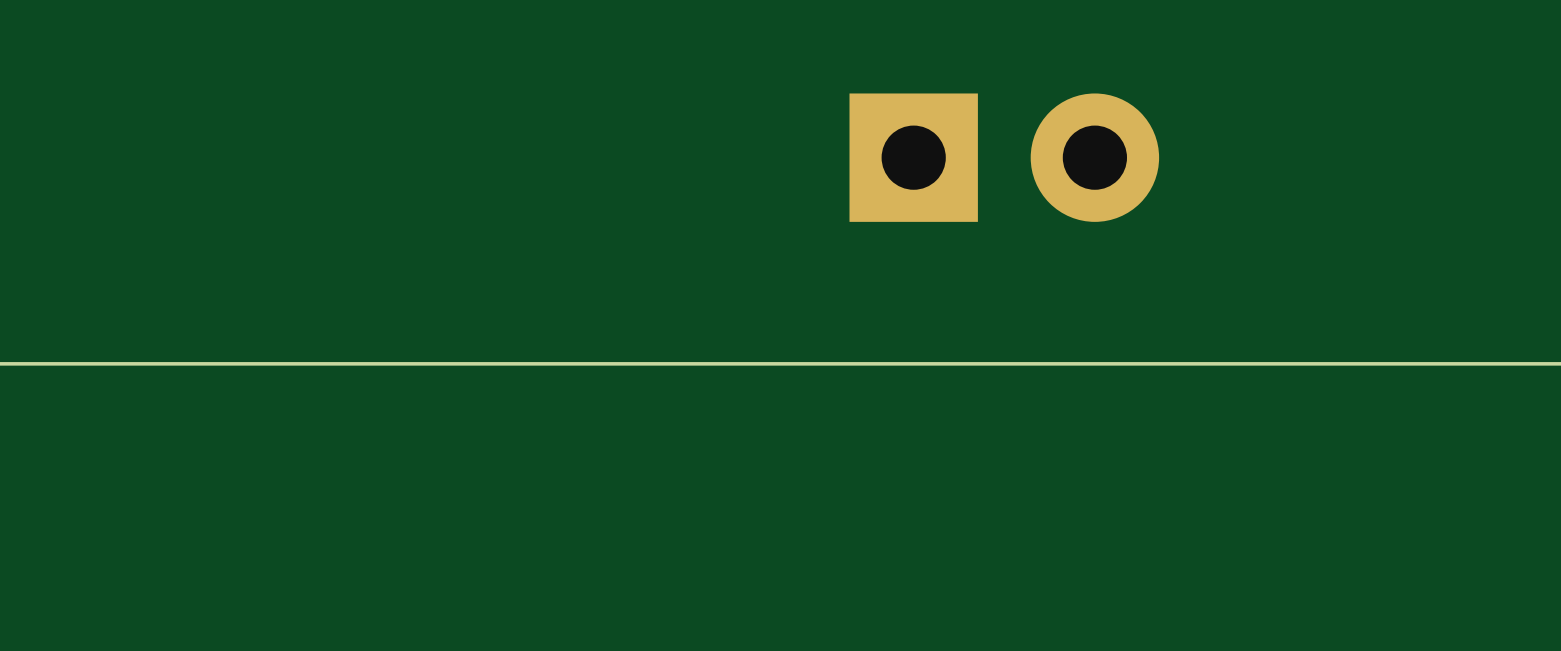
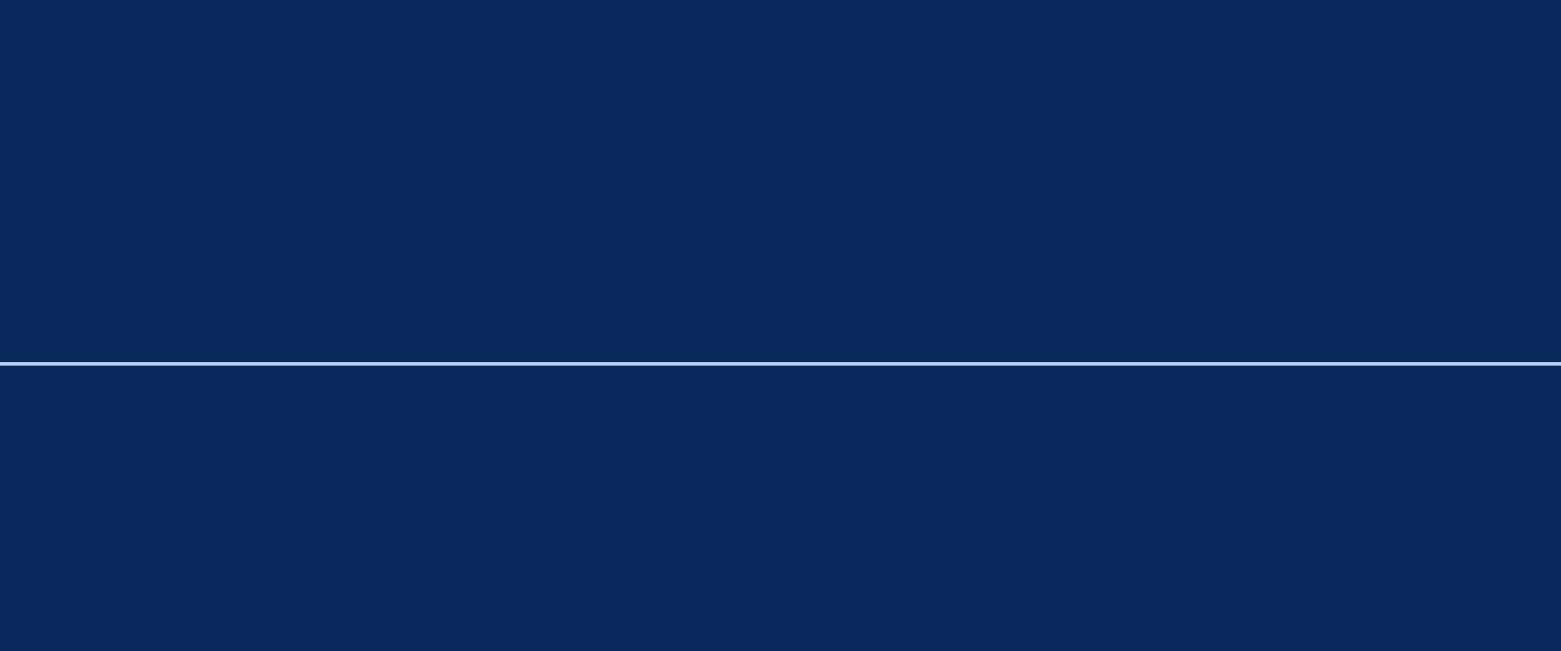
part: (1004, 157) -> none

